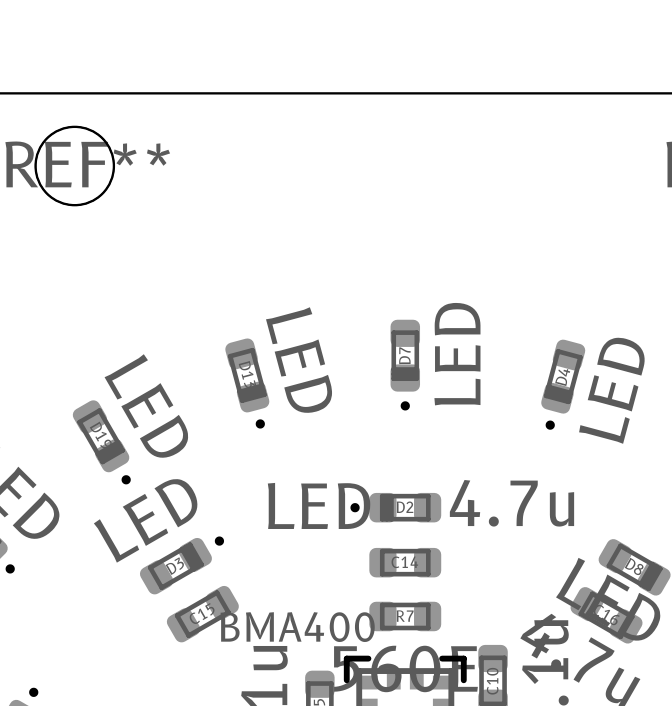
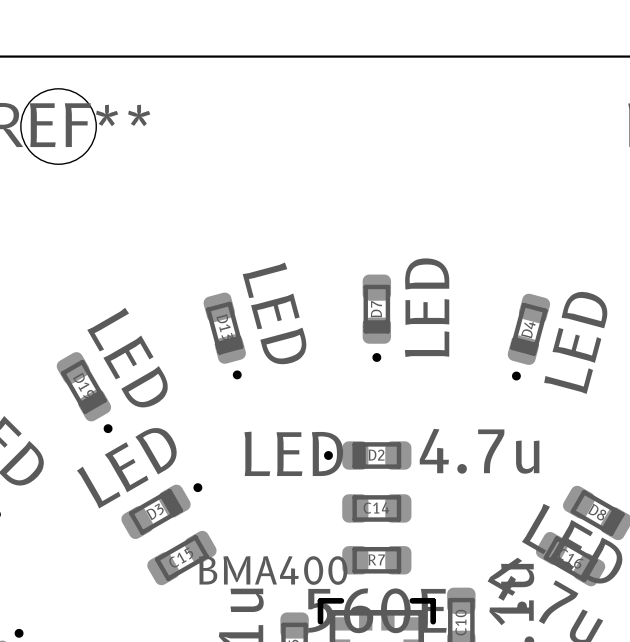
round board edge: [34, 125, 116, 207] -> none

